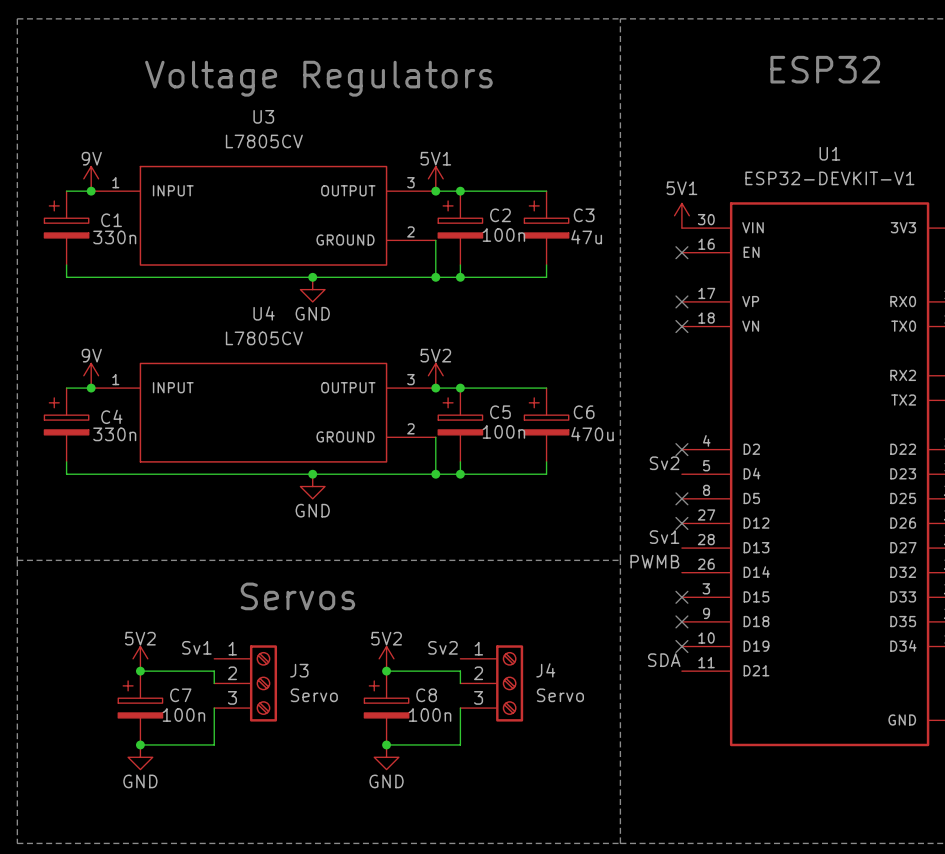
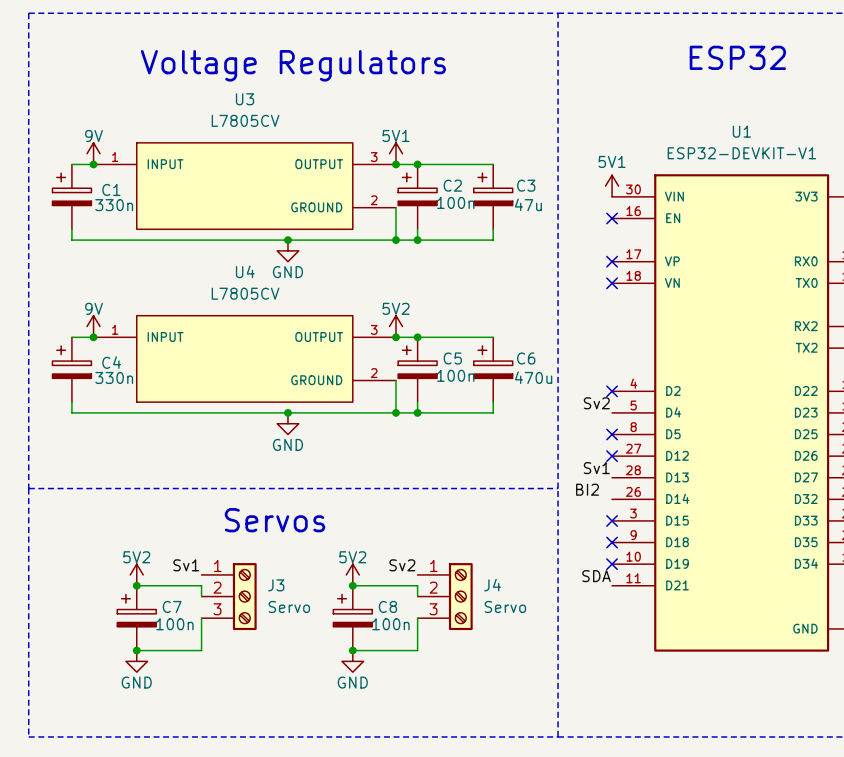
label: none -> BI2 (587, 489)
label: PWMB (654, 561) -> none

